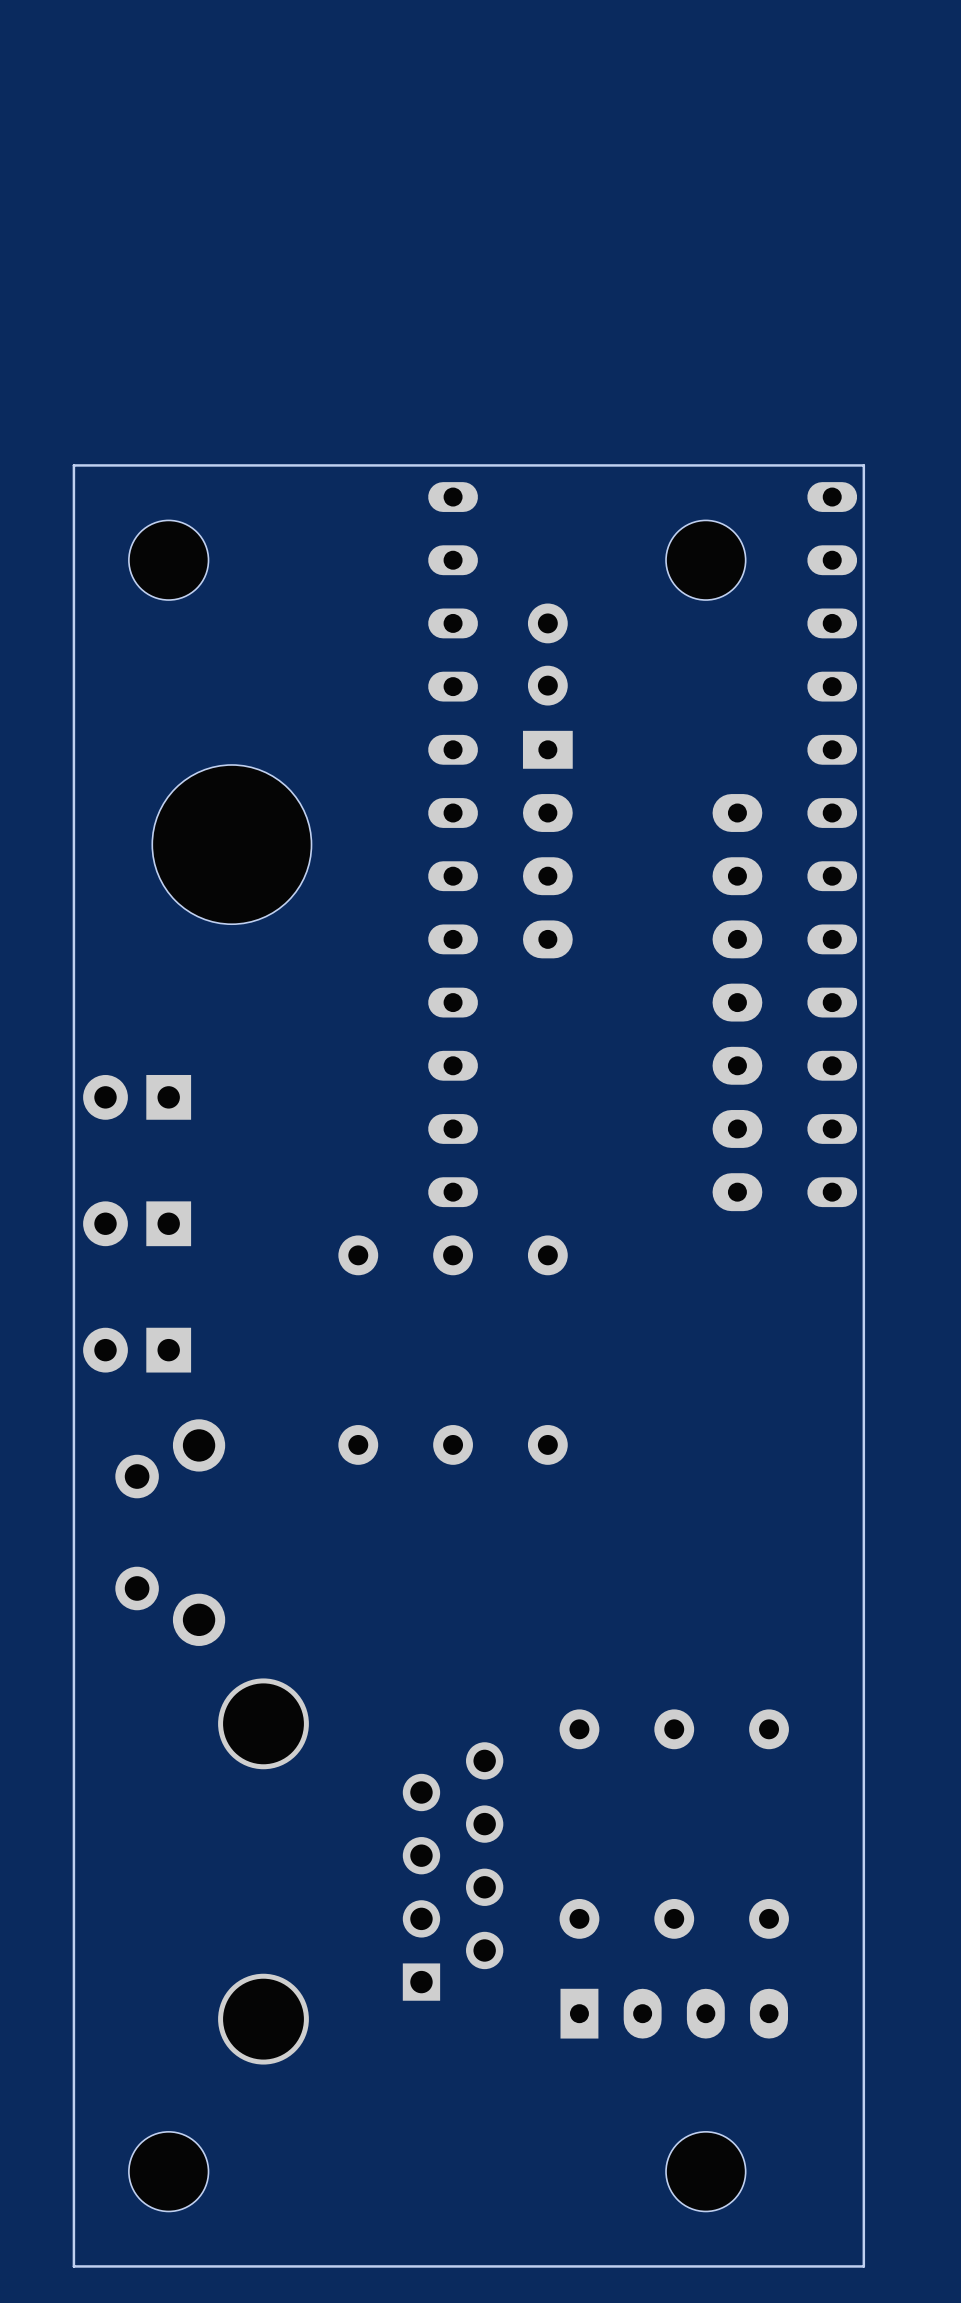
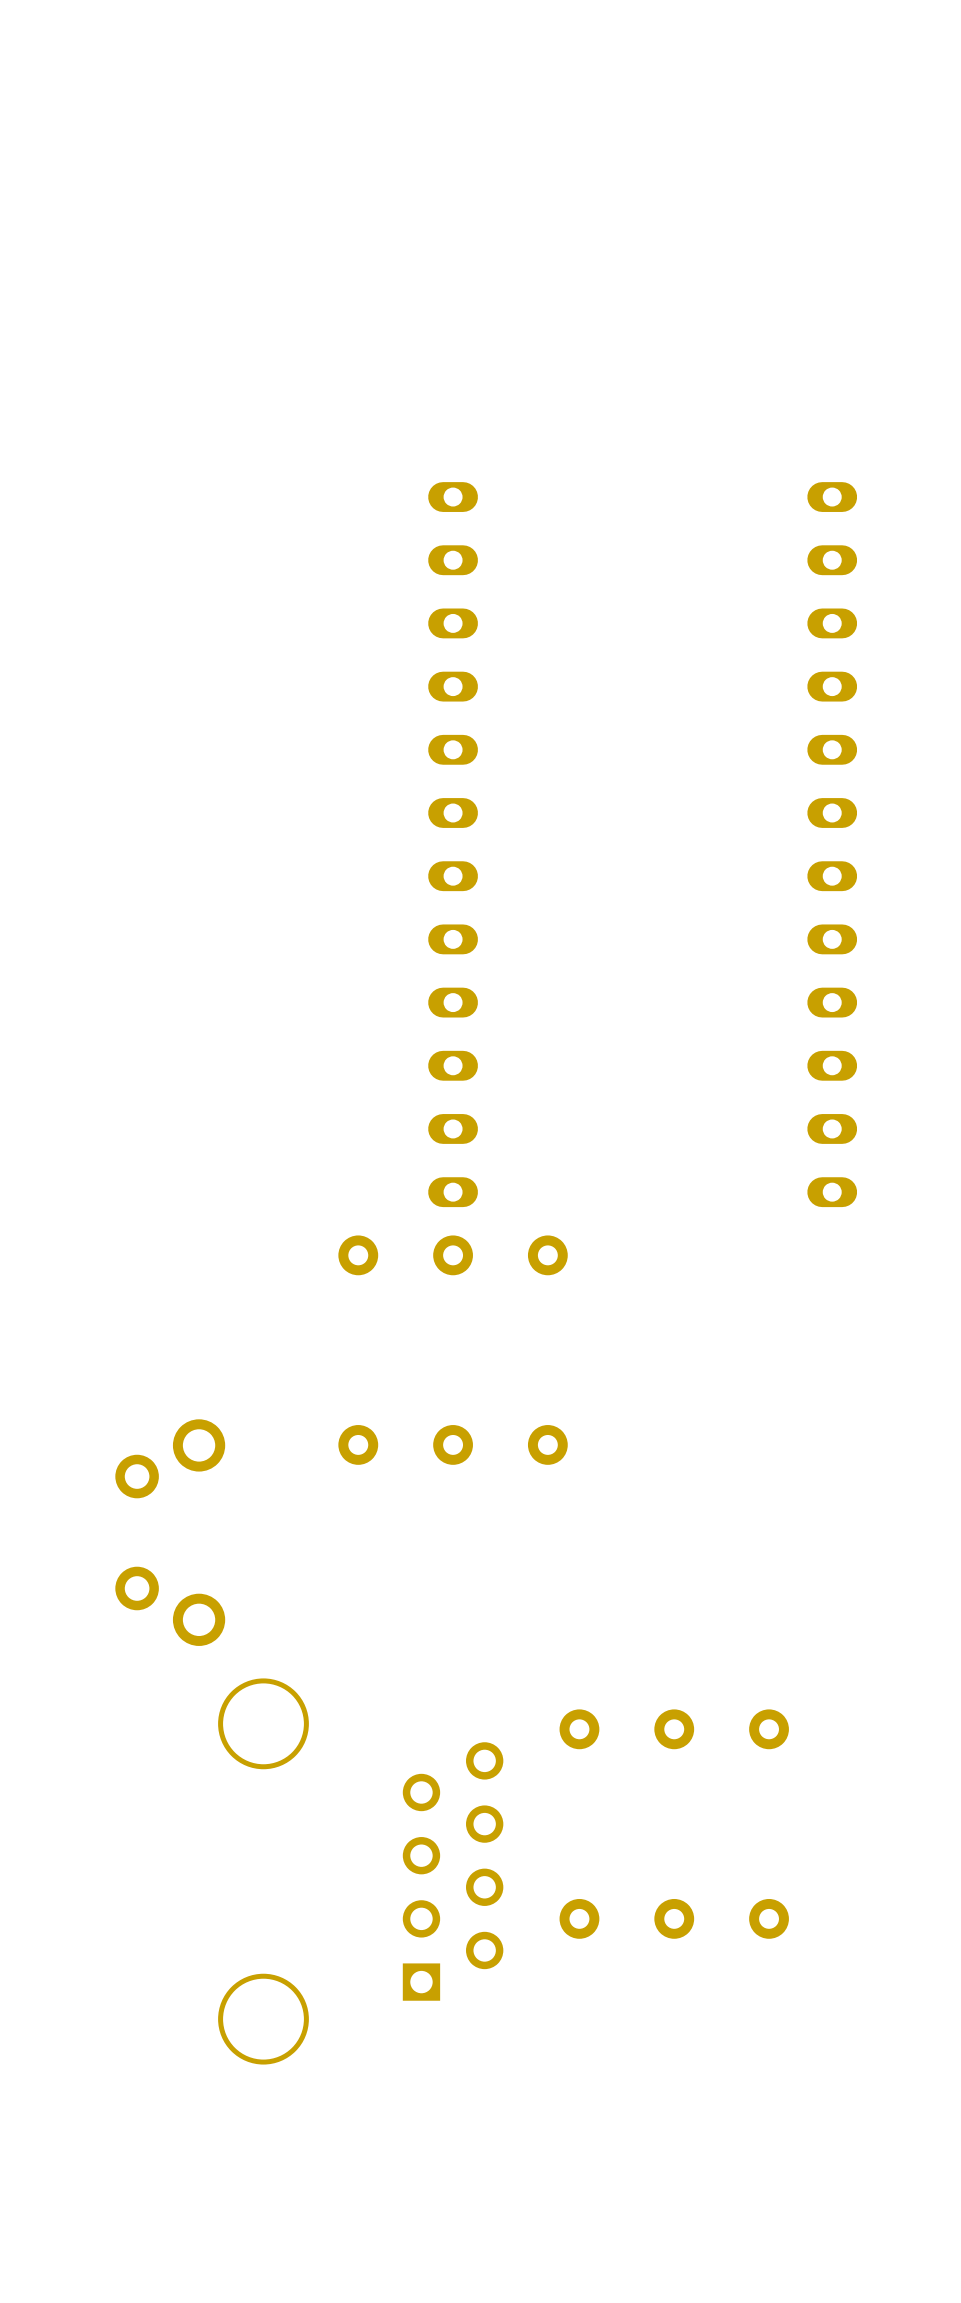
board edge: (863, 465) (863, 2266) (73, 2266) (73, 465) (863, 465) -> none
part: (168, 560) -> none
part: (705, 560) -> none
part: (547, 654) -> none
part: (231, 844) -> none
part: (547, 844) -> none
part: (737, 1002) -> none
part: (137, 1097) -> none
part: (137, 1223) -> none
part: (137, 1350) -> none
part: (674, 2013) -> none
part: (168, 2171) -> none
part: (705, 2171) -> none

